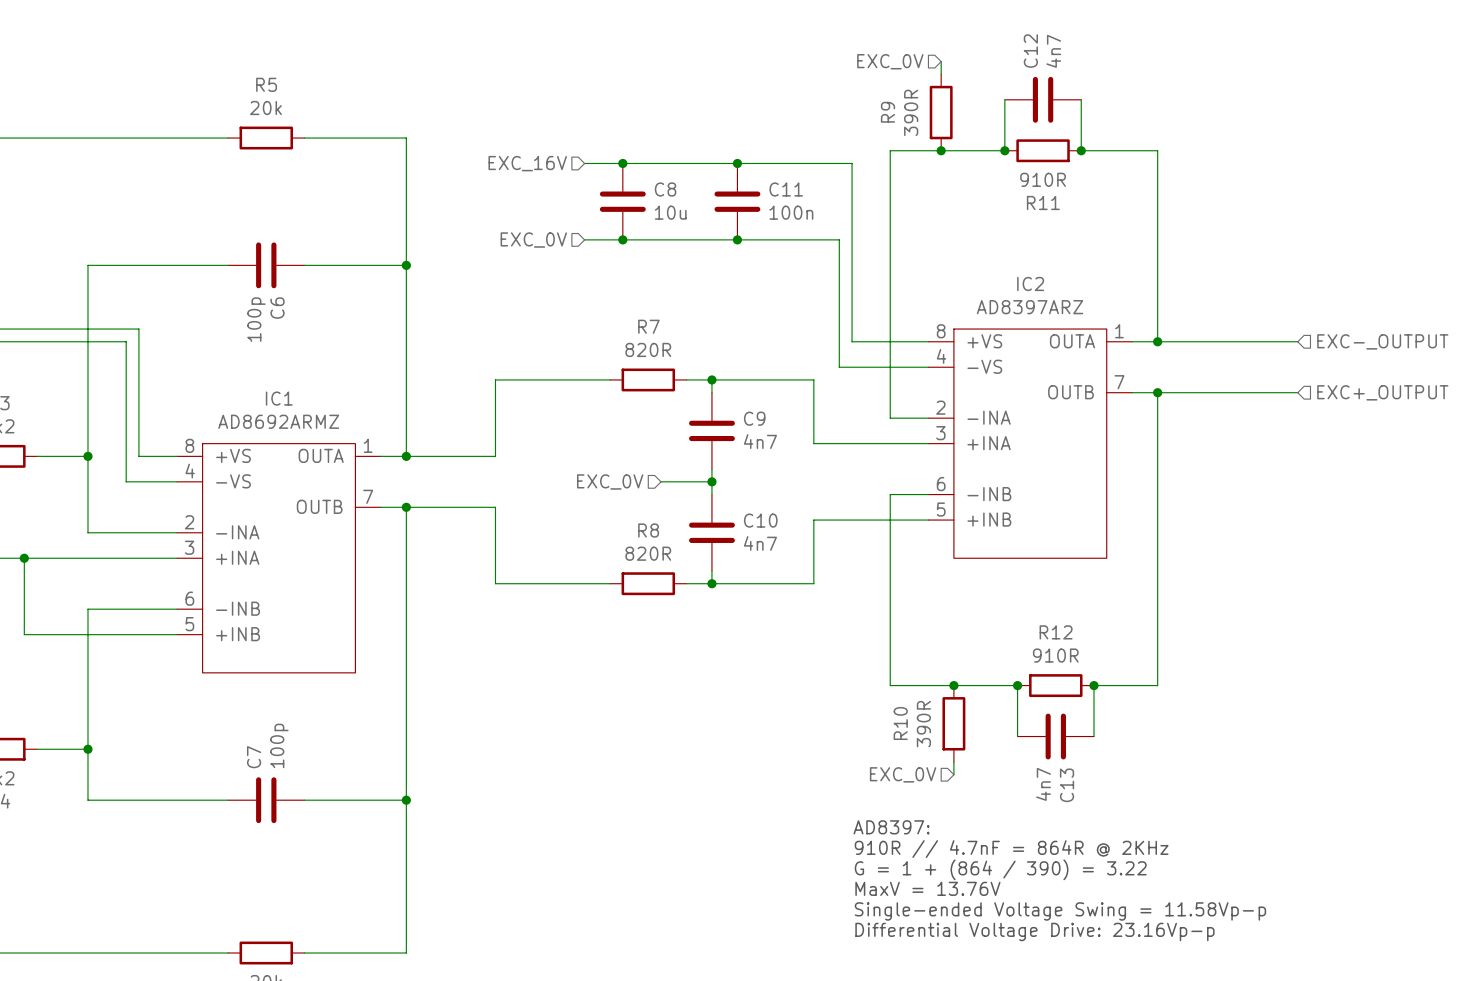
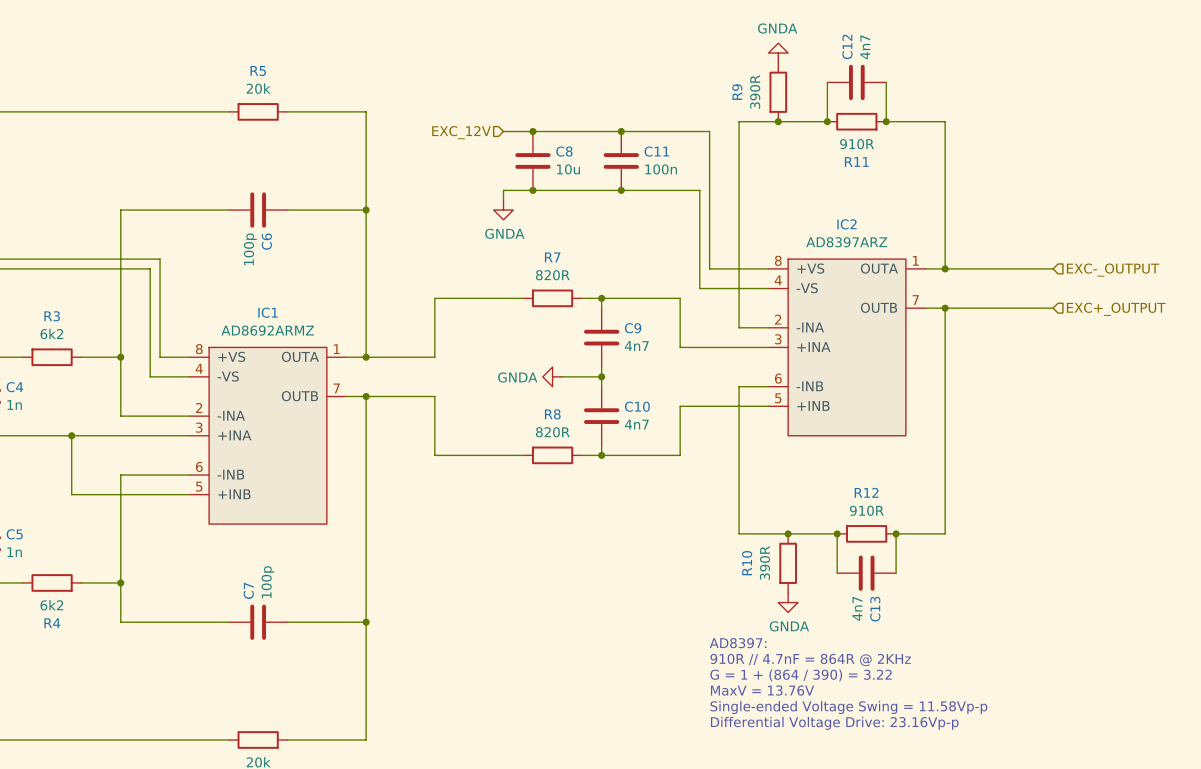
hierarchical label: EXC_0V (890, 61) -> none
power symbol: none -> GNDA (778, 53)
hierarchical label: EXC_16V (527, 163) -> EXC_12V (461, 132)
wire: none -> (503, 190) (503, 200)
hierarchical label: EXC_0V (533, 240) -> none
power symbol: none -> GNDA (503, 210)
hierarchical label: EXC_0V (610, 481) -> none
power symbol: none -> GNDA (552, 376)
hierarchical label: EXC_0V (903, 774) -> none
power symbol: none -> GNDA (788, 602)

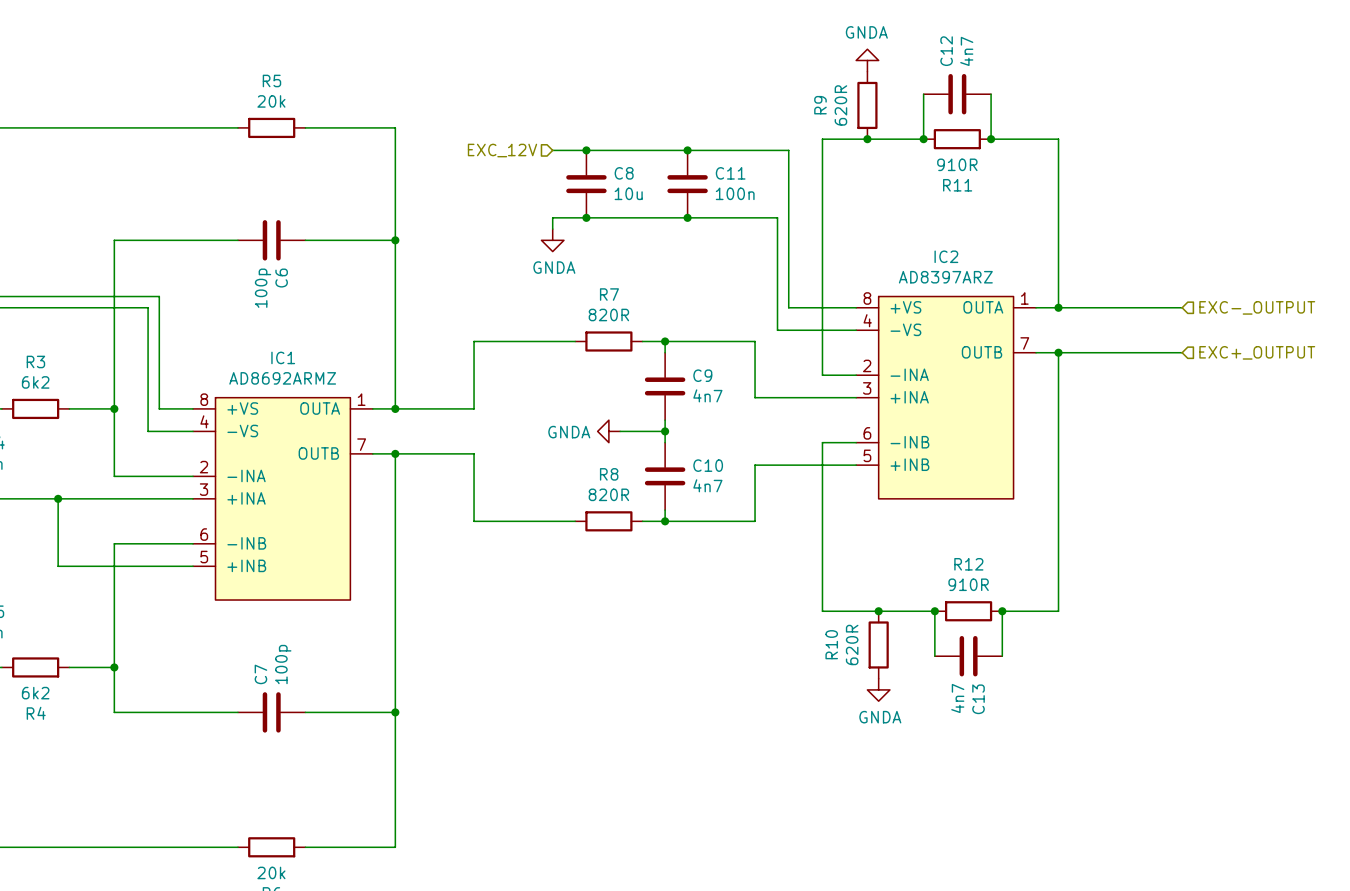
R9 value: 390R (755, 91) -> 620R (840, 105)
R10 value: 390R (764, 563) -> 620R (852, 644)
text: AD8397: (738, 643) -> none
text: 910R // 4.7nF = 864R @ 2KHz (810, 660) -> none
text: G = 1 + (864 / 390) = 3.22 (801, 675) -> none
text: MaxV = 13.76V (762, 690) -> none
text: Single-ended Voltage Swing = 11.58Vp-p (848, 707) -> none
text: Differential Voltage Drive: 23.16Vp-p (834, 723) -> none

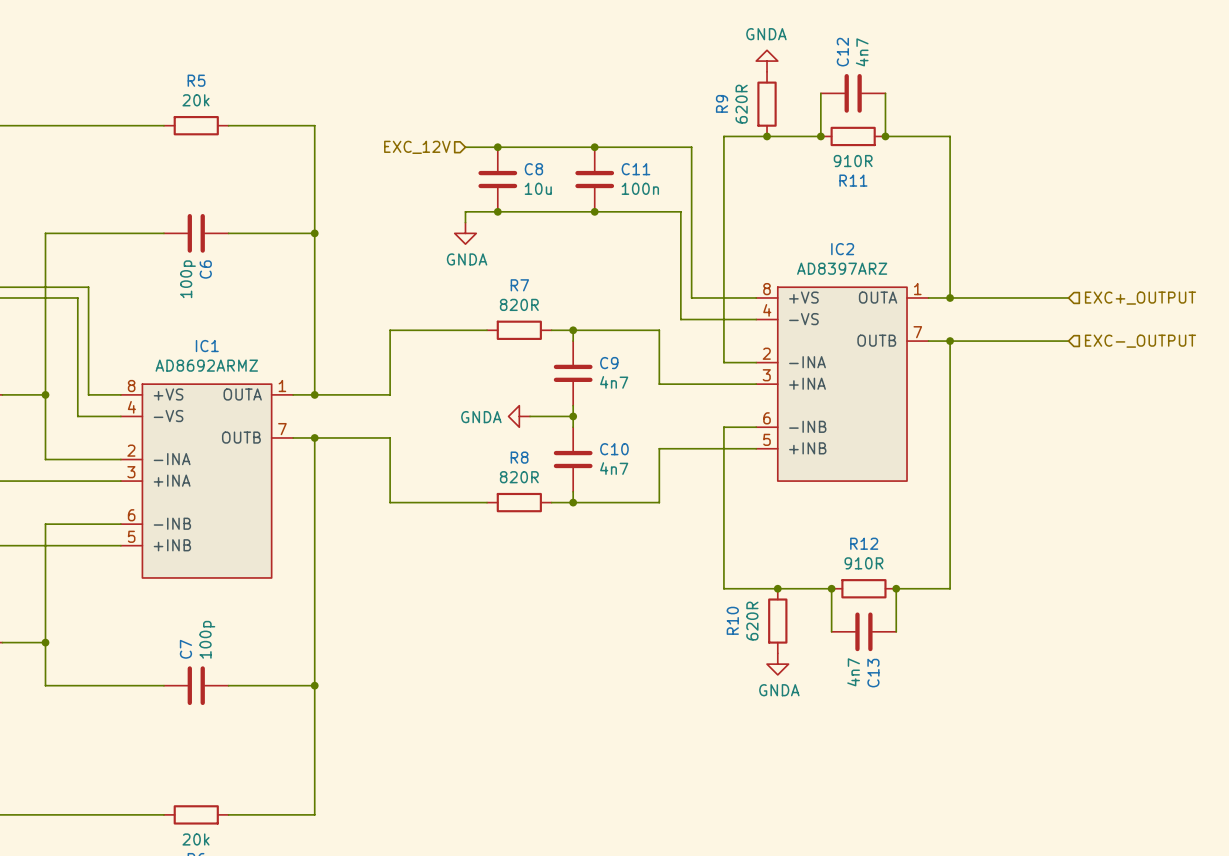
hierarchical label: EXC-_OUTPUT (1257, 307) -> EXC+_OUTPUT (1140, 298)
hierarchical label: EXC+_OUTPUT (1257, 352) -> EXC-_OUTPUT (1140, 341)

